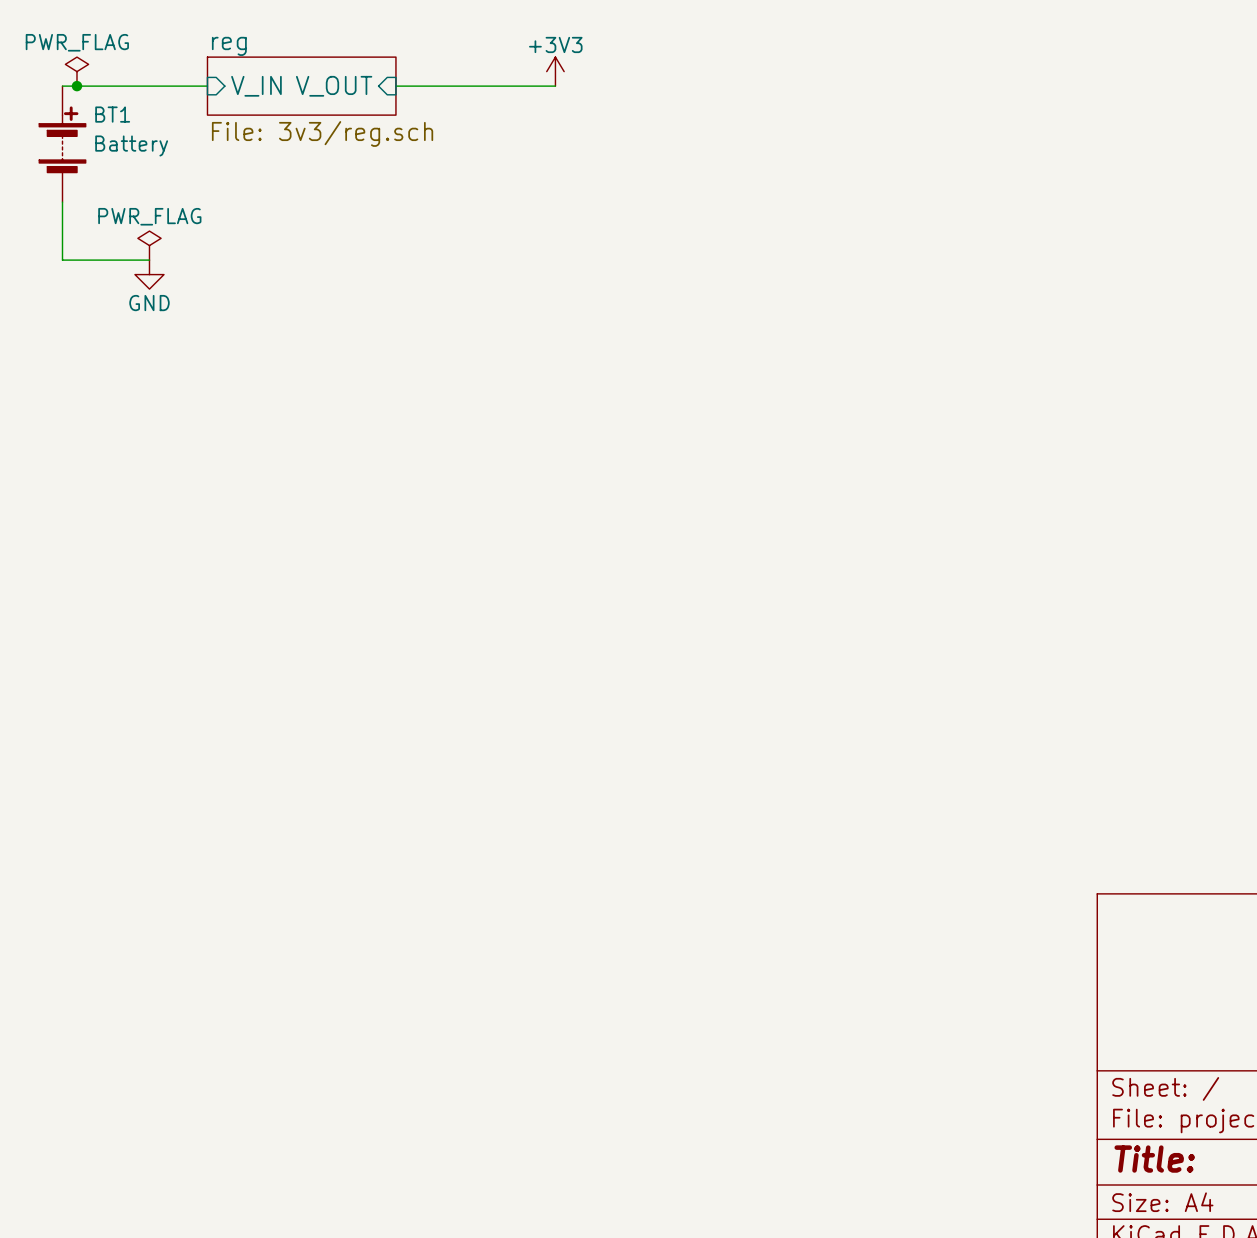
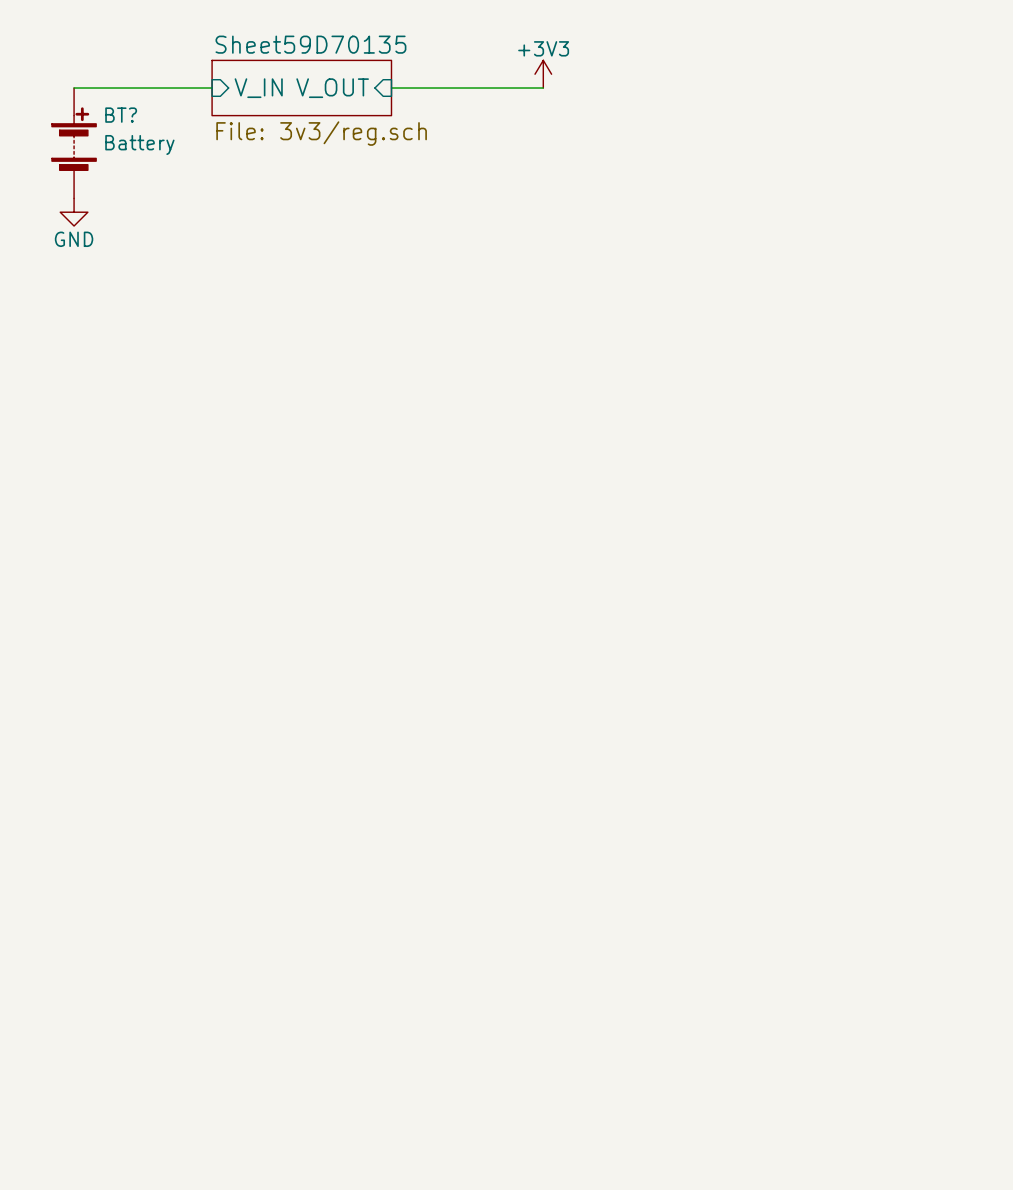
sheet reg name: reg (229, 46) -> Sheet59D70135 (310, 44)
power symbol: PWR_FLAG (76, 71) -> none
junction: (76, 86) -> none
BT1 name: BT1 (112, 114) -> BT? (121, 115)
wire: (62, 202) (62, 260) (149, 260) -> none
power symbol: PWR_FLAG (149, 245) -> none
power symbol position: GND (149, 274) -> GND (74, 212)

